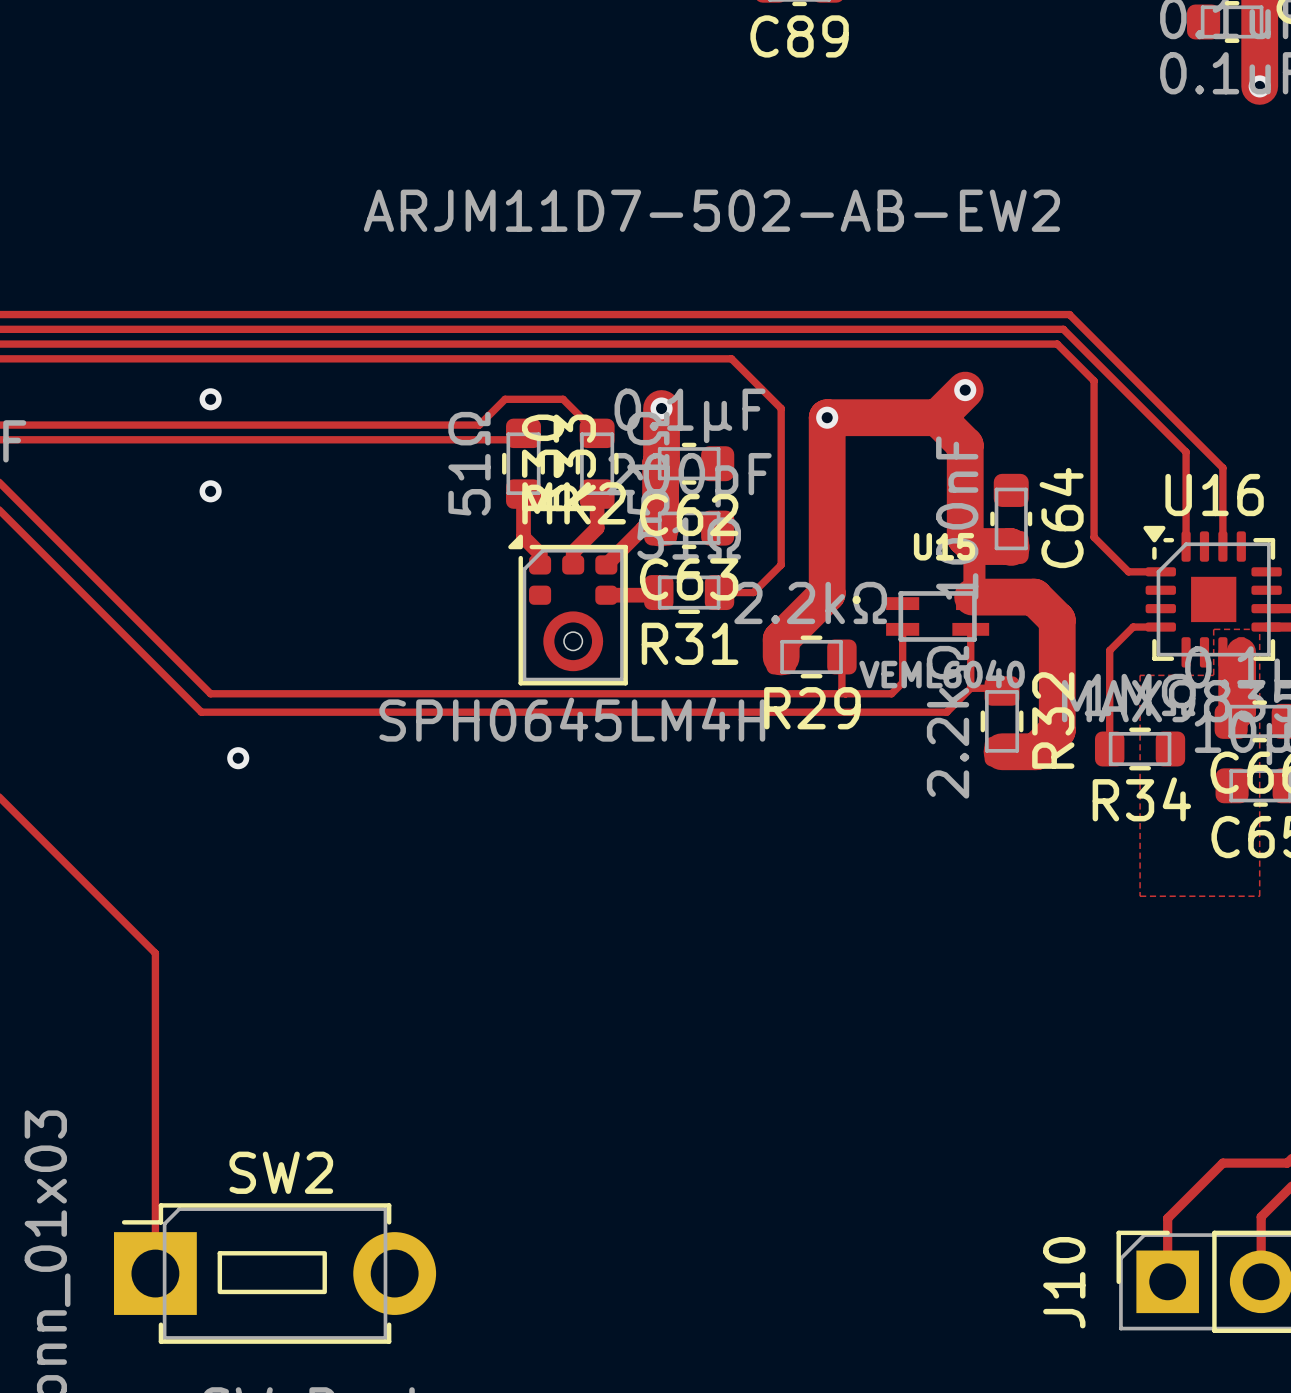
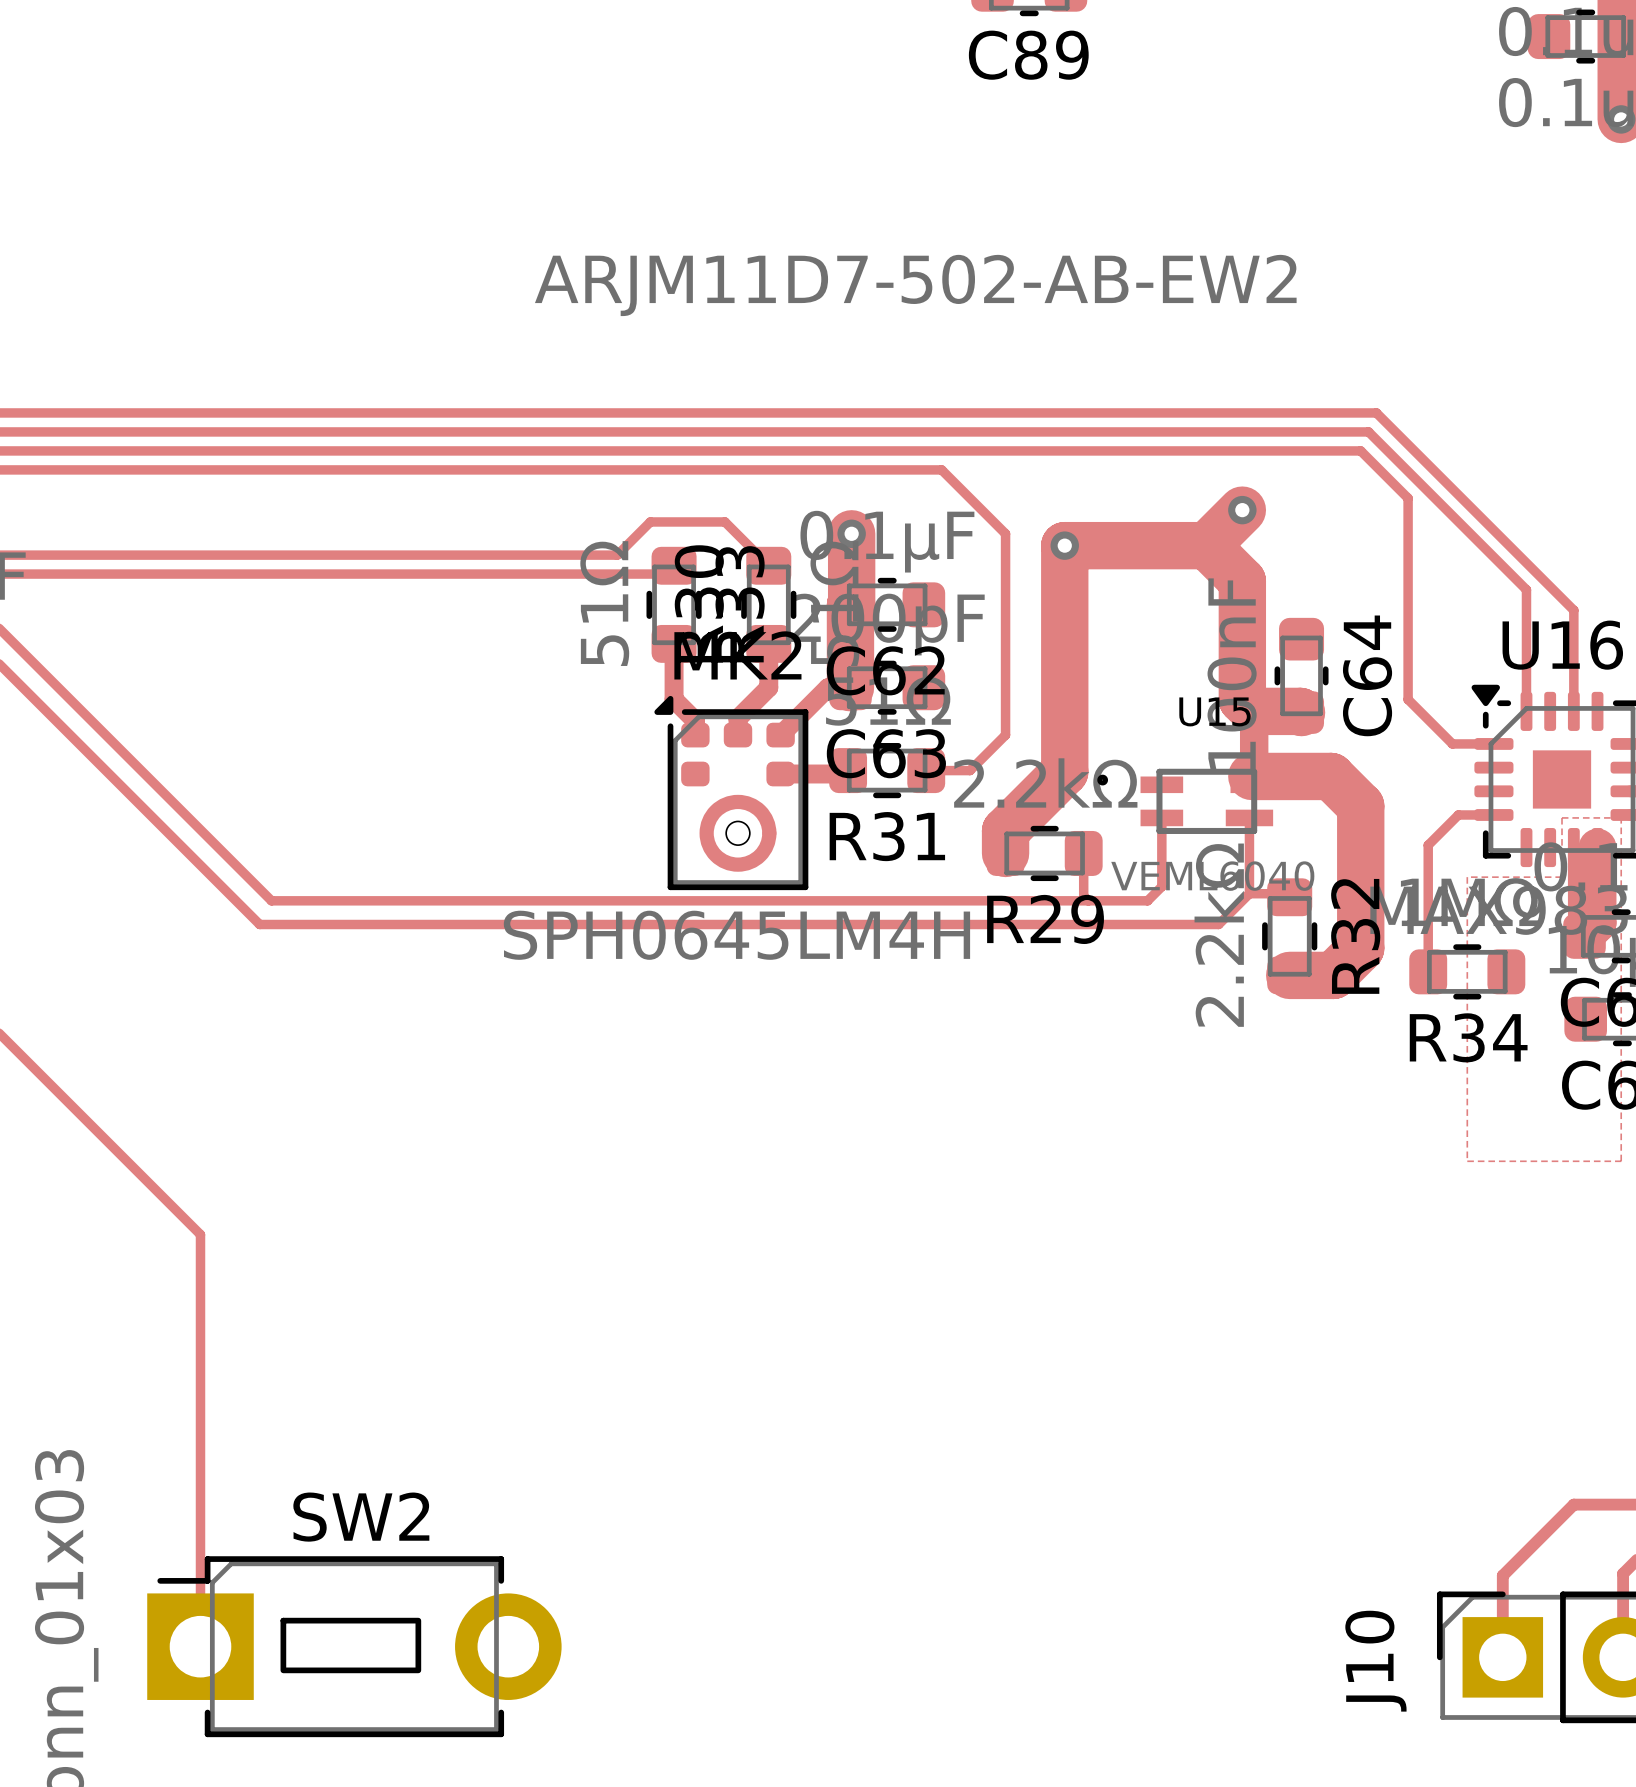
via: (210, 399) -> none
via: (210, 491) -> none
via: (238, 758) -> none

